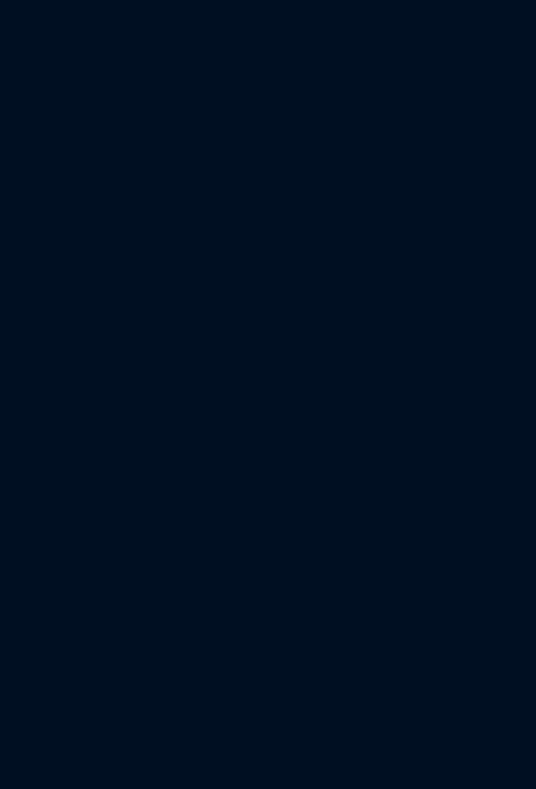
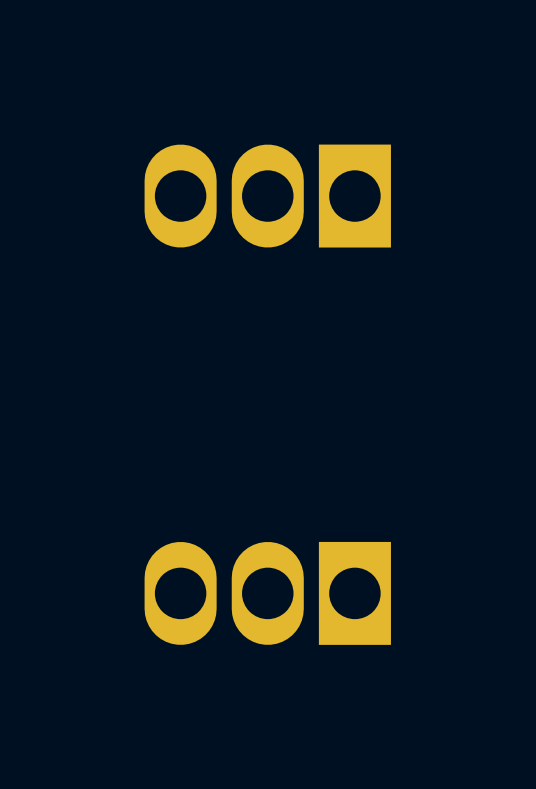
part: none -> (267, 196)
part: none -> (267, 593)

